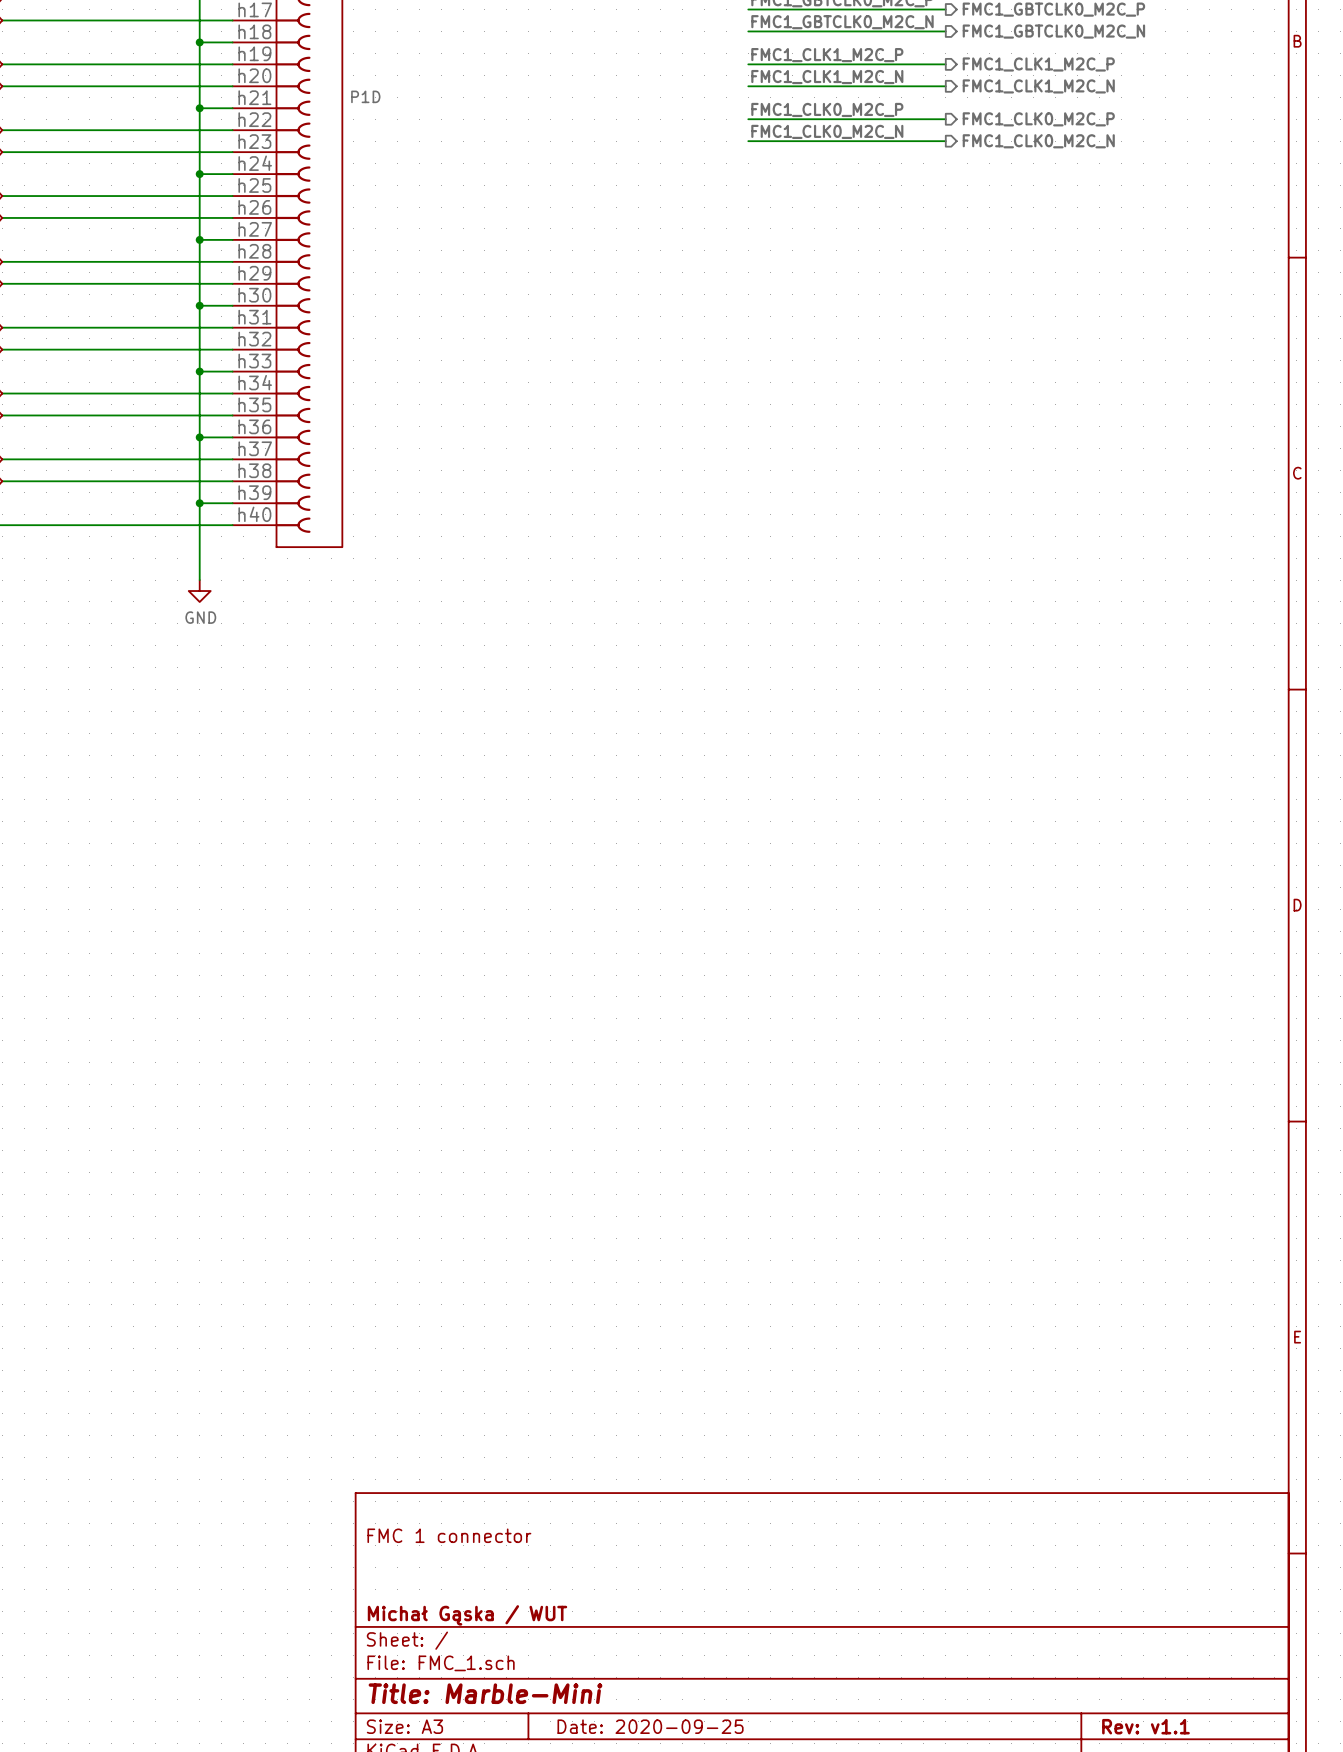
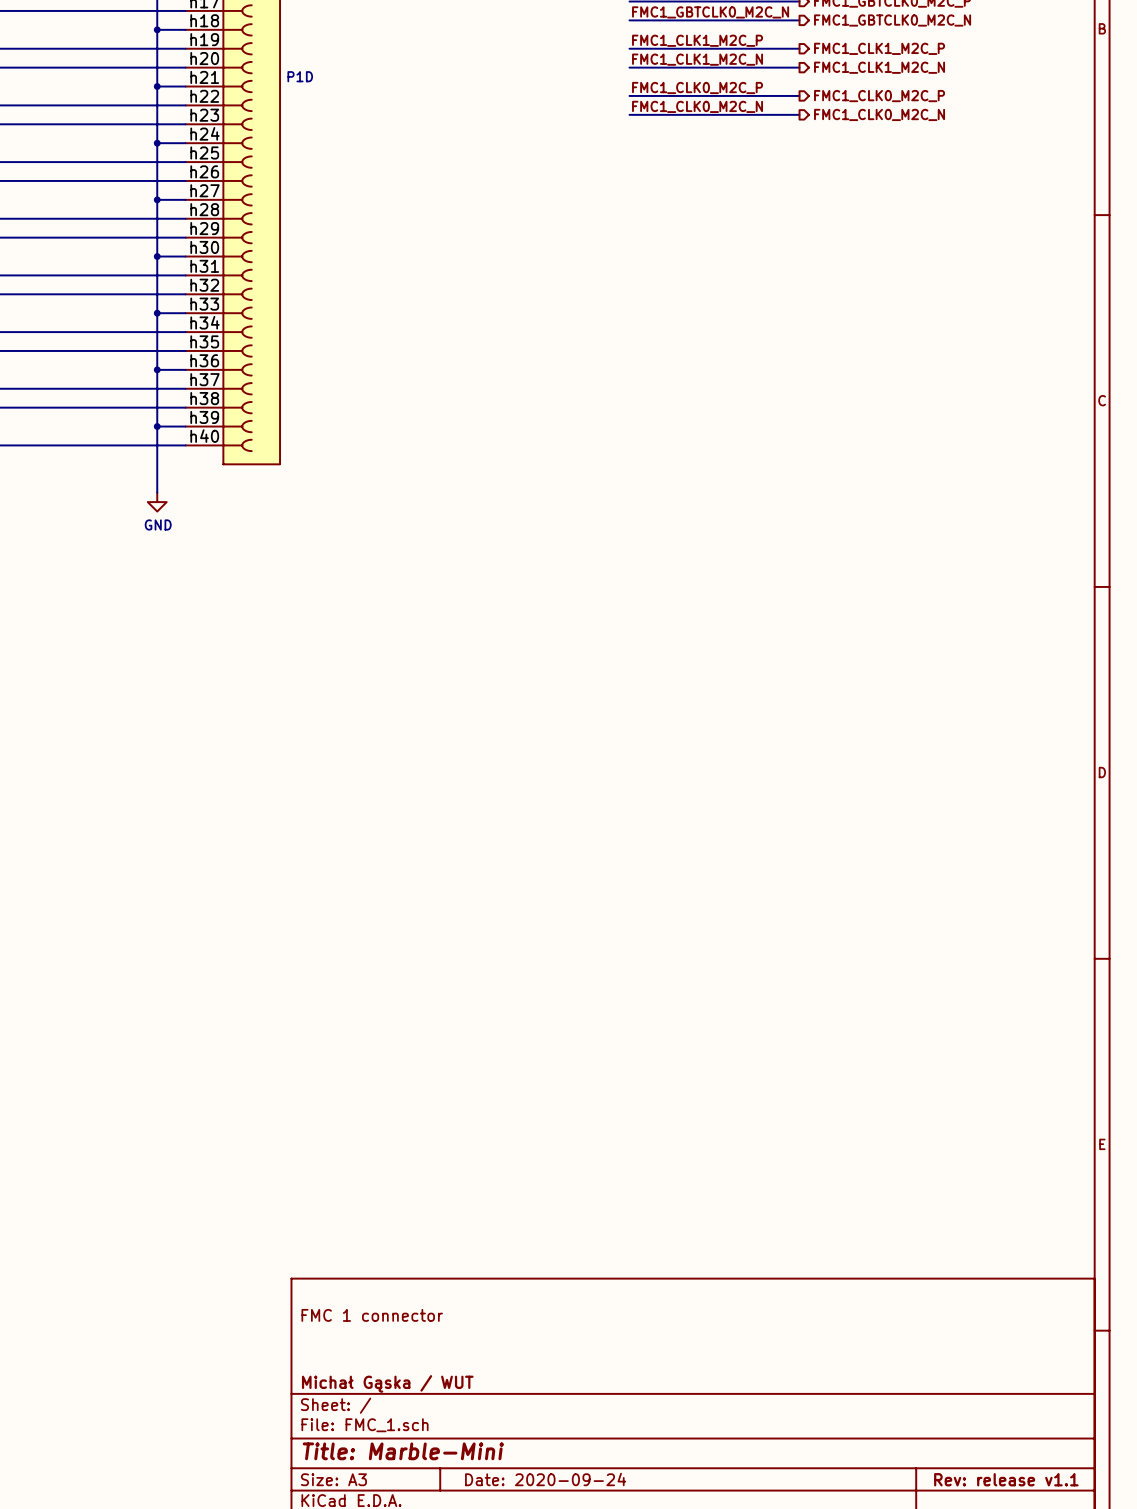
title block: Date: 2020-09-25 (650, 1726) -> Date: 2020-09-24 (545, 1479)
title block: Rev: v1.1 (1145, 1726) -> Rev: release v1.1 (1006, 1479)

